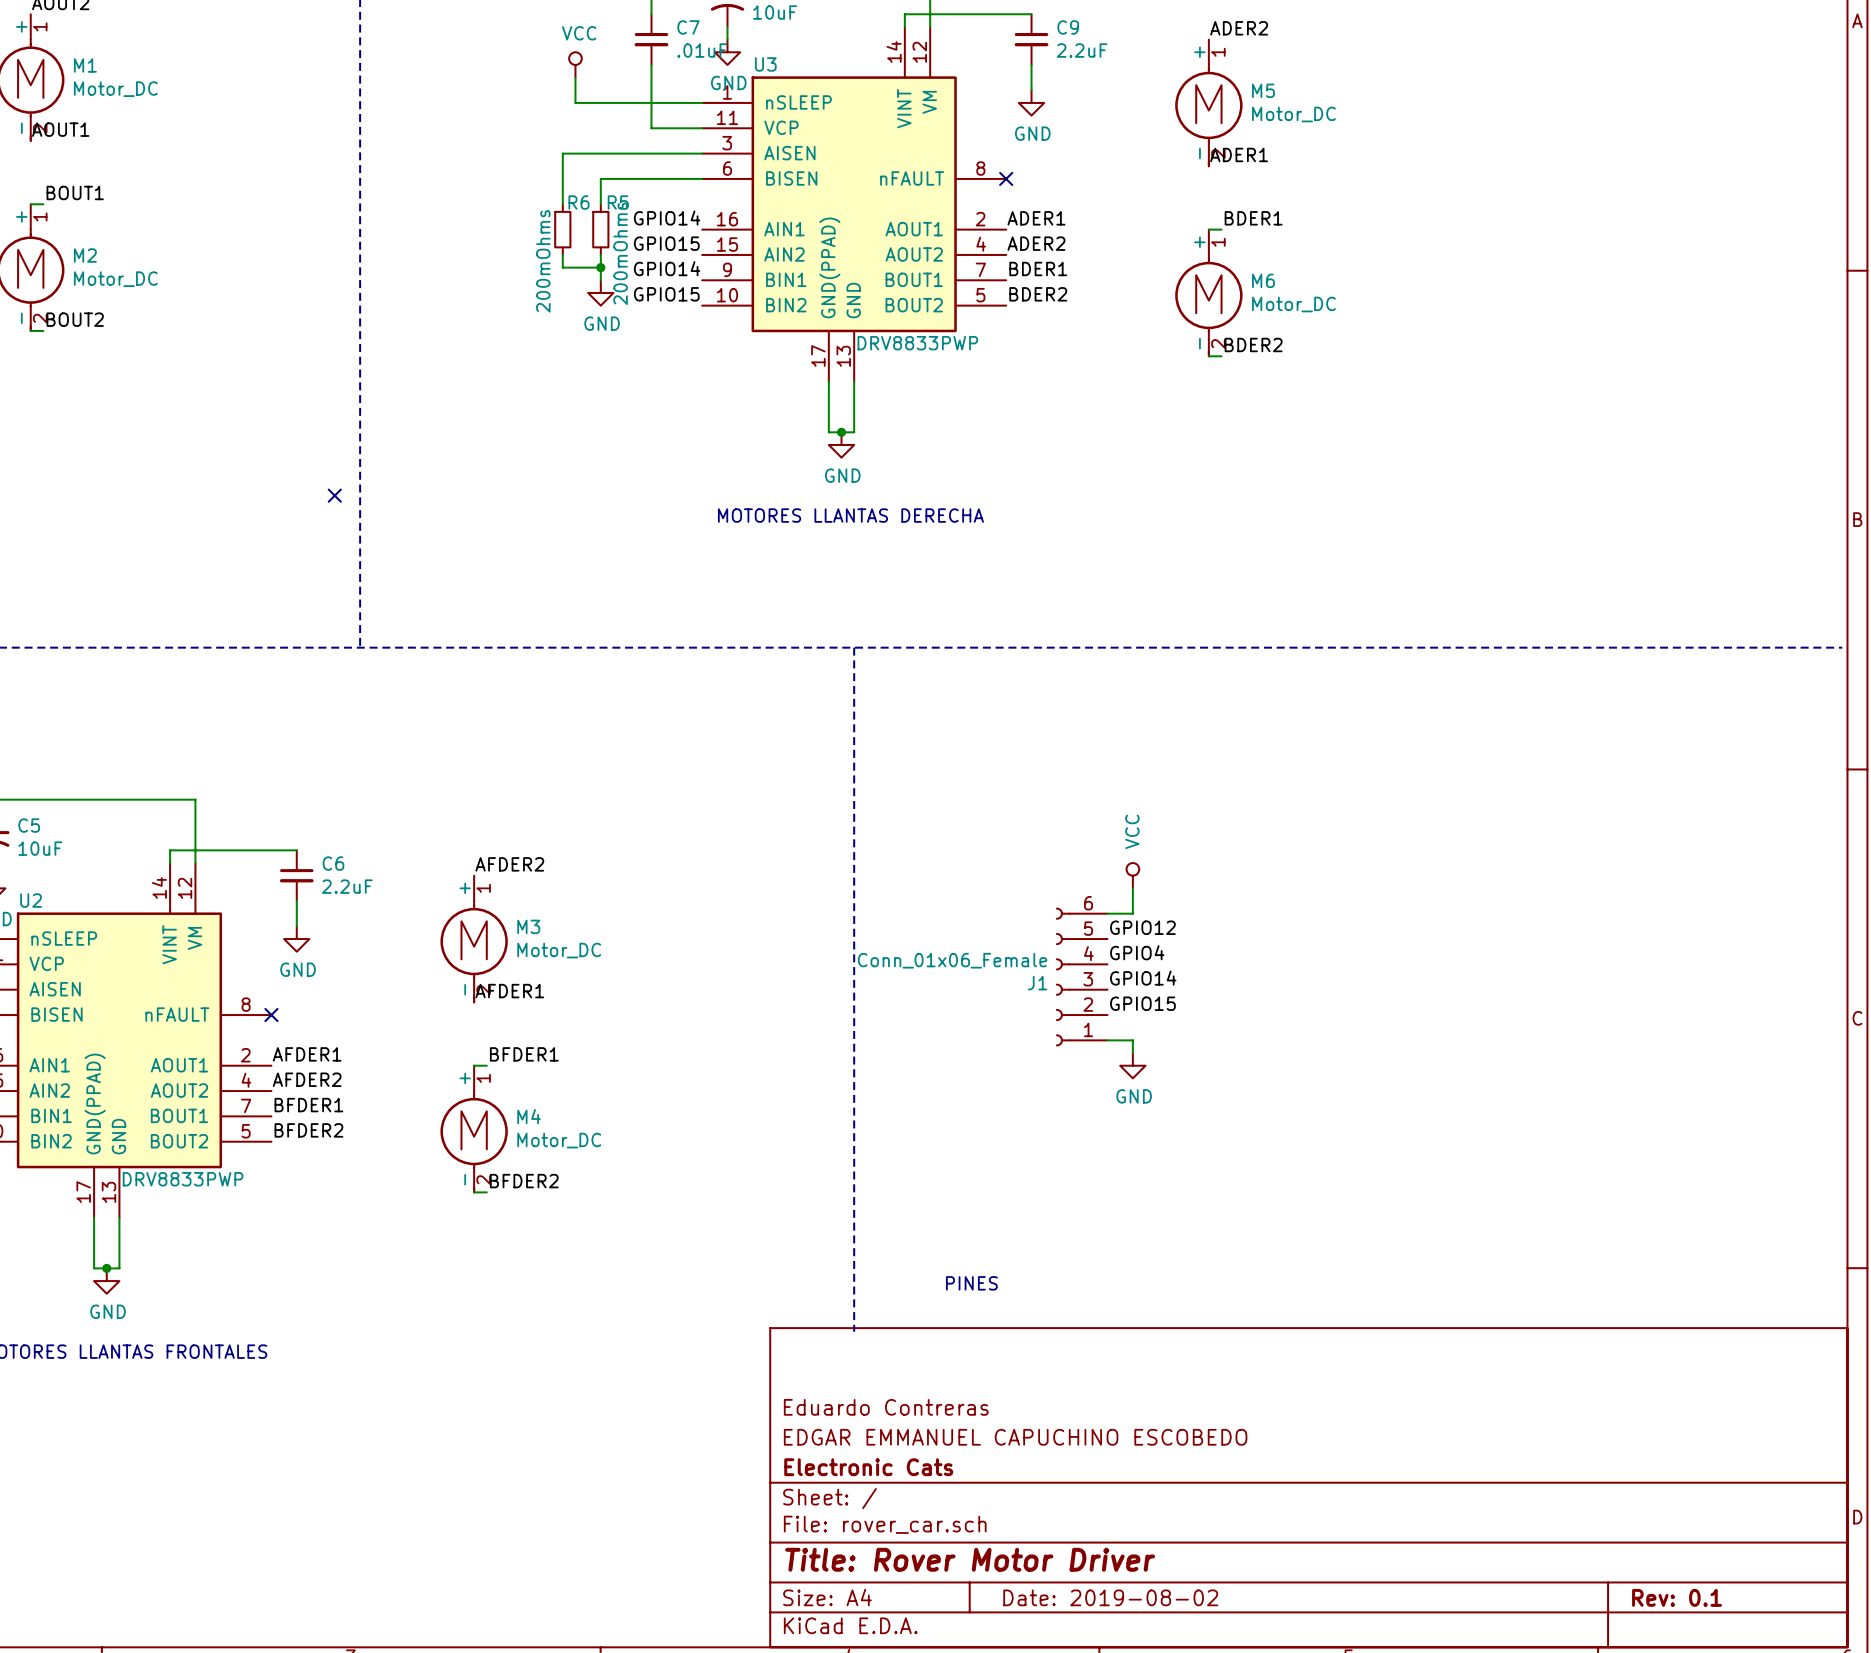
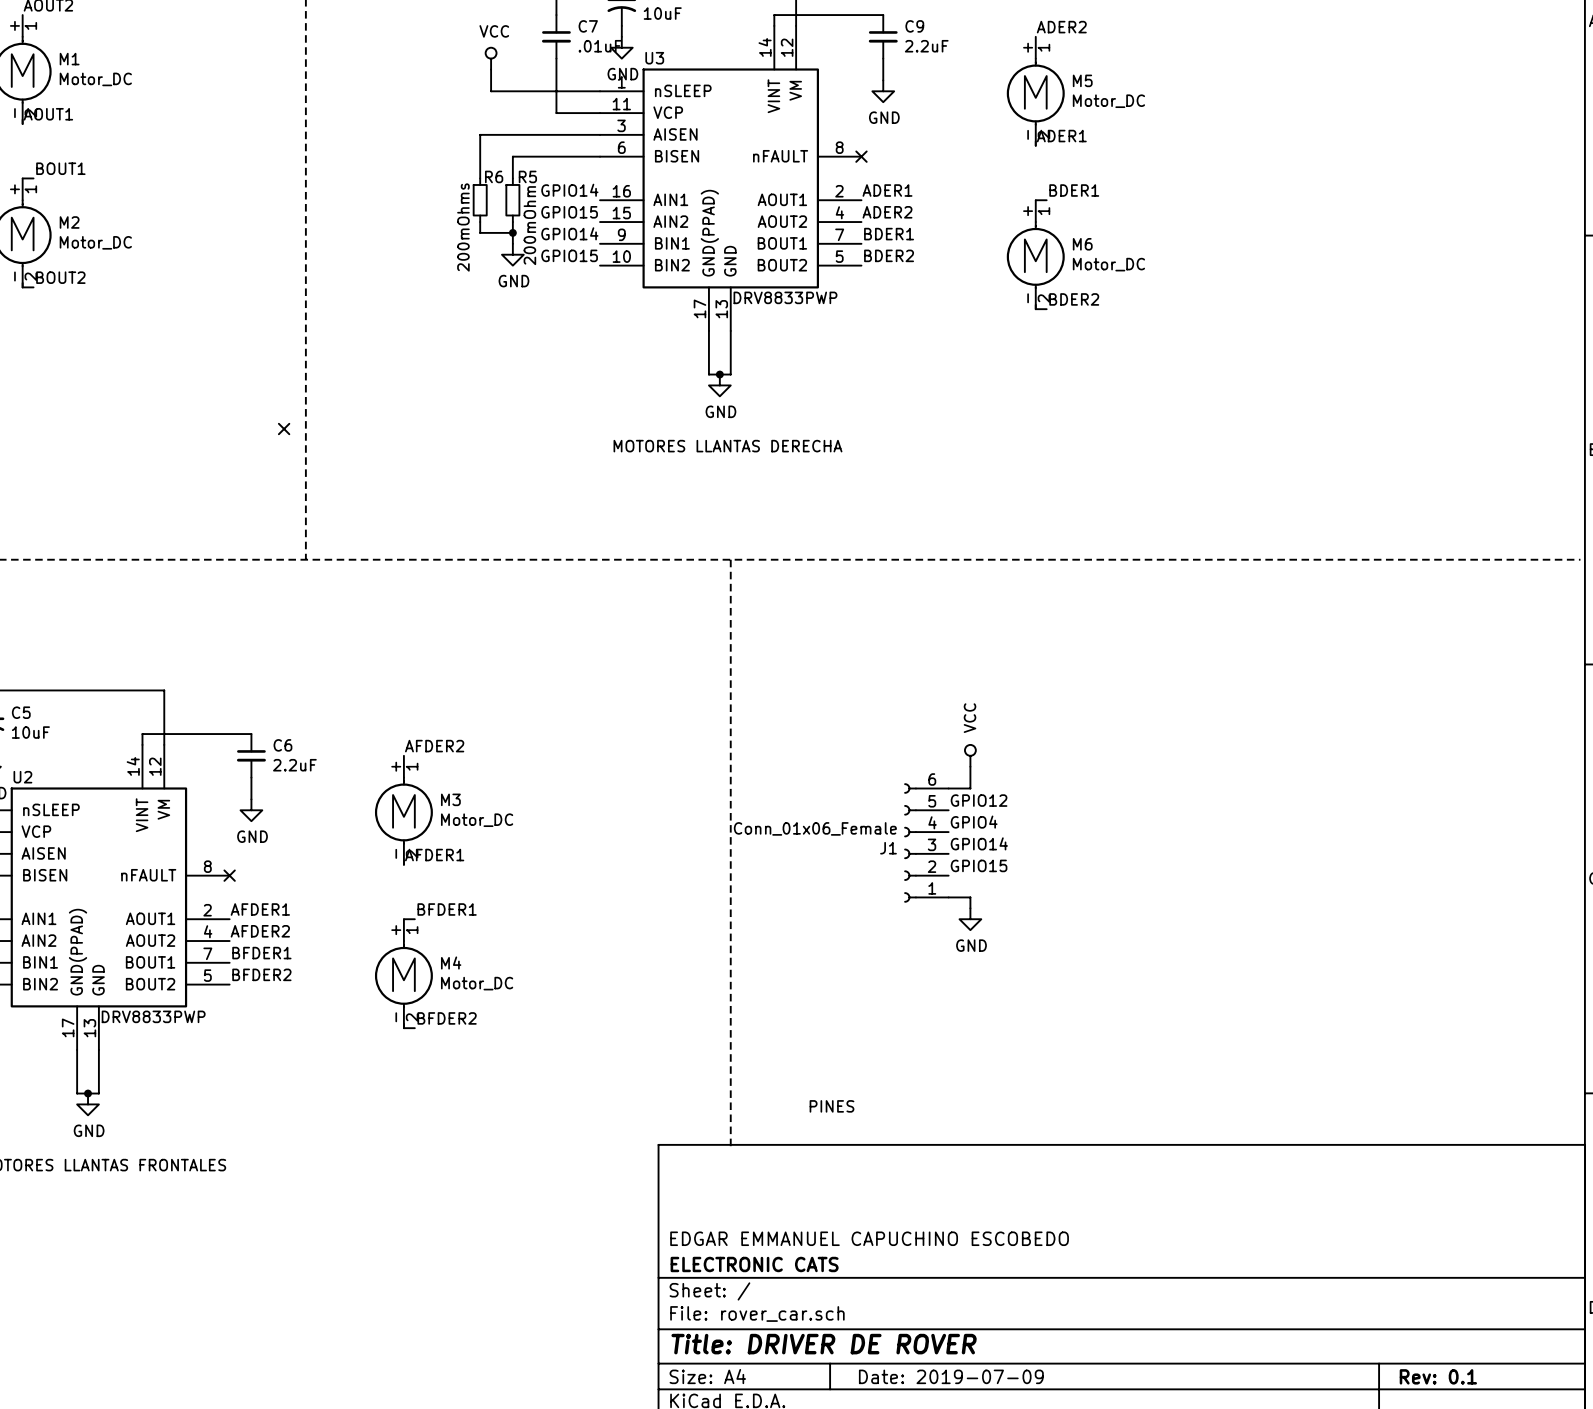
R5 value: 200mOhms (620, 253) -> 200mOhm (529, 225)
title block: Eduardo Contreras (886, 1407) -> none
title block: Electronic Cats (868, 1467) -> ELECTRONIC CATS (754, 1264)
title block: Title: Rover Motor Driver (970, 1559) -> Title: DRIVER DE ROVER (824, 1344)
title block: Date: 2019-08-02 (1110, 1597) -> Date: 2019-07-09 (951, 1376)

